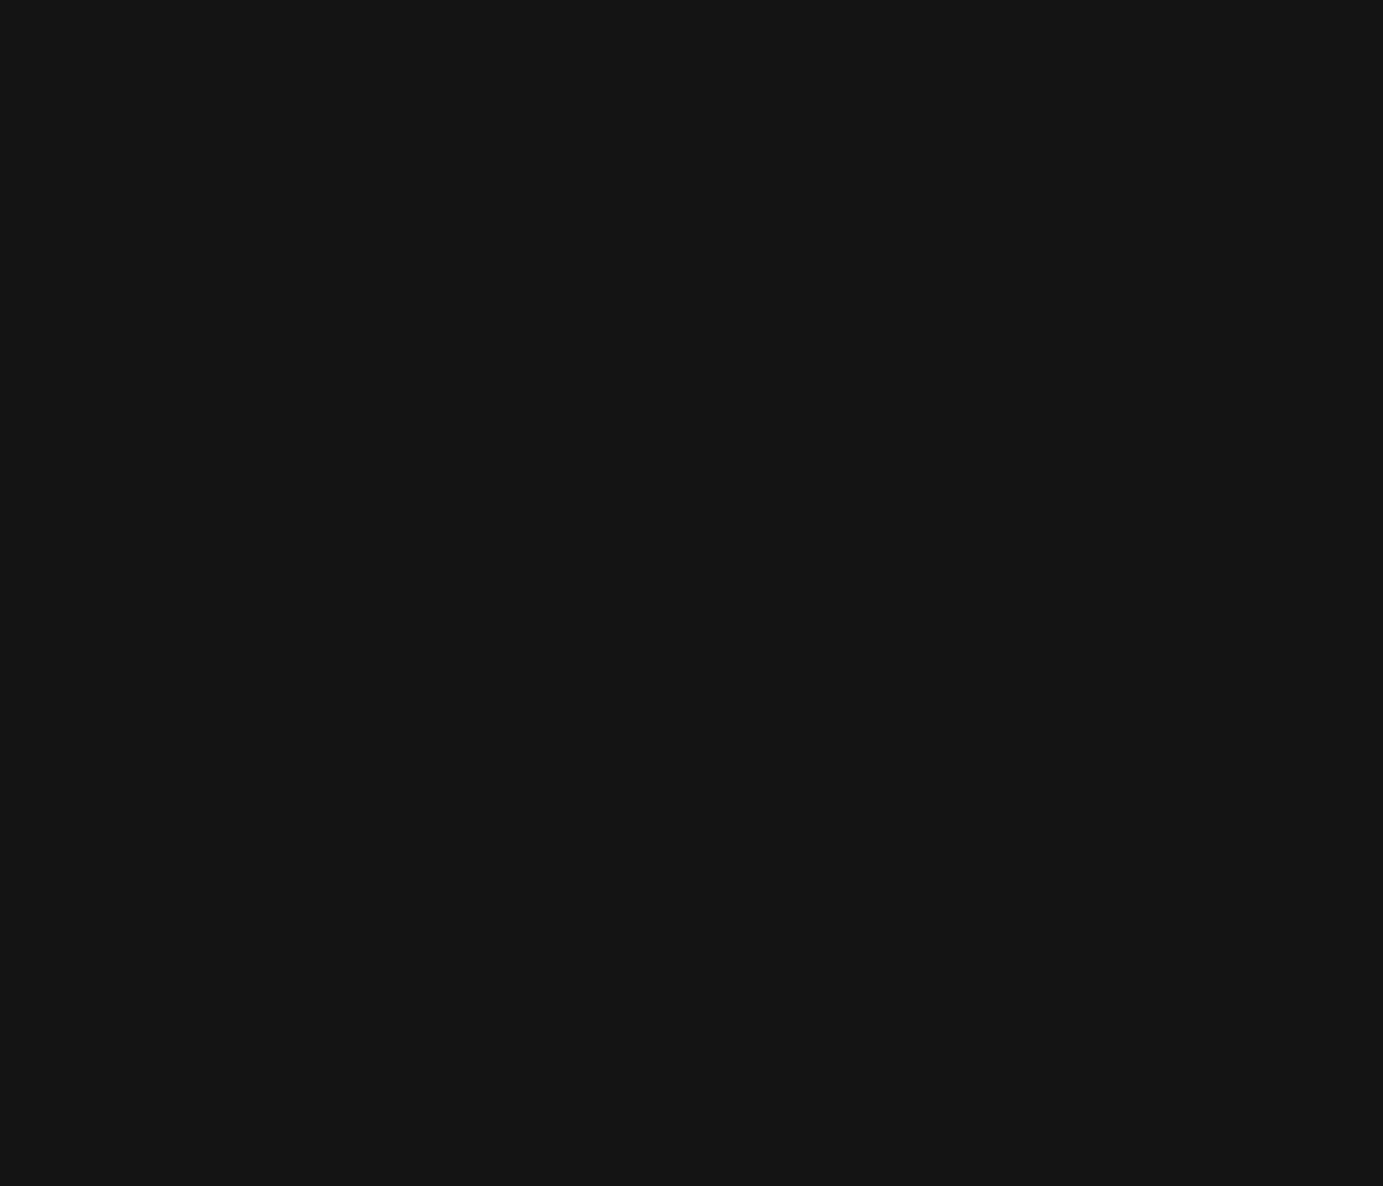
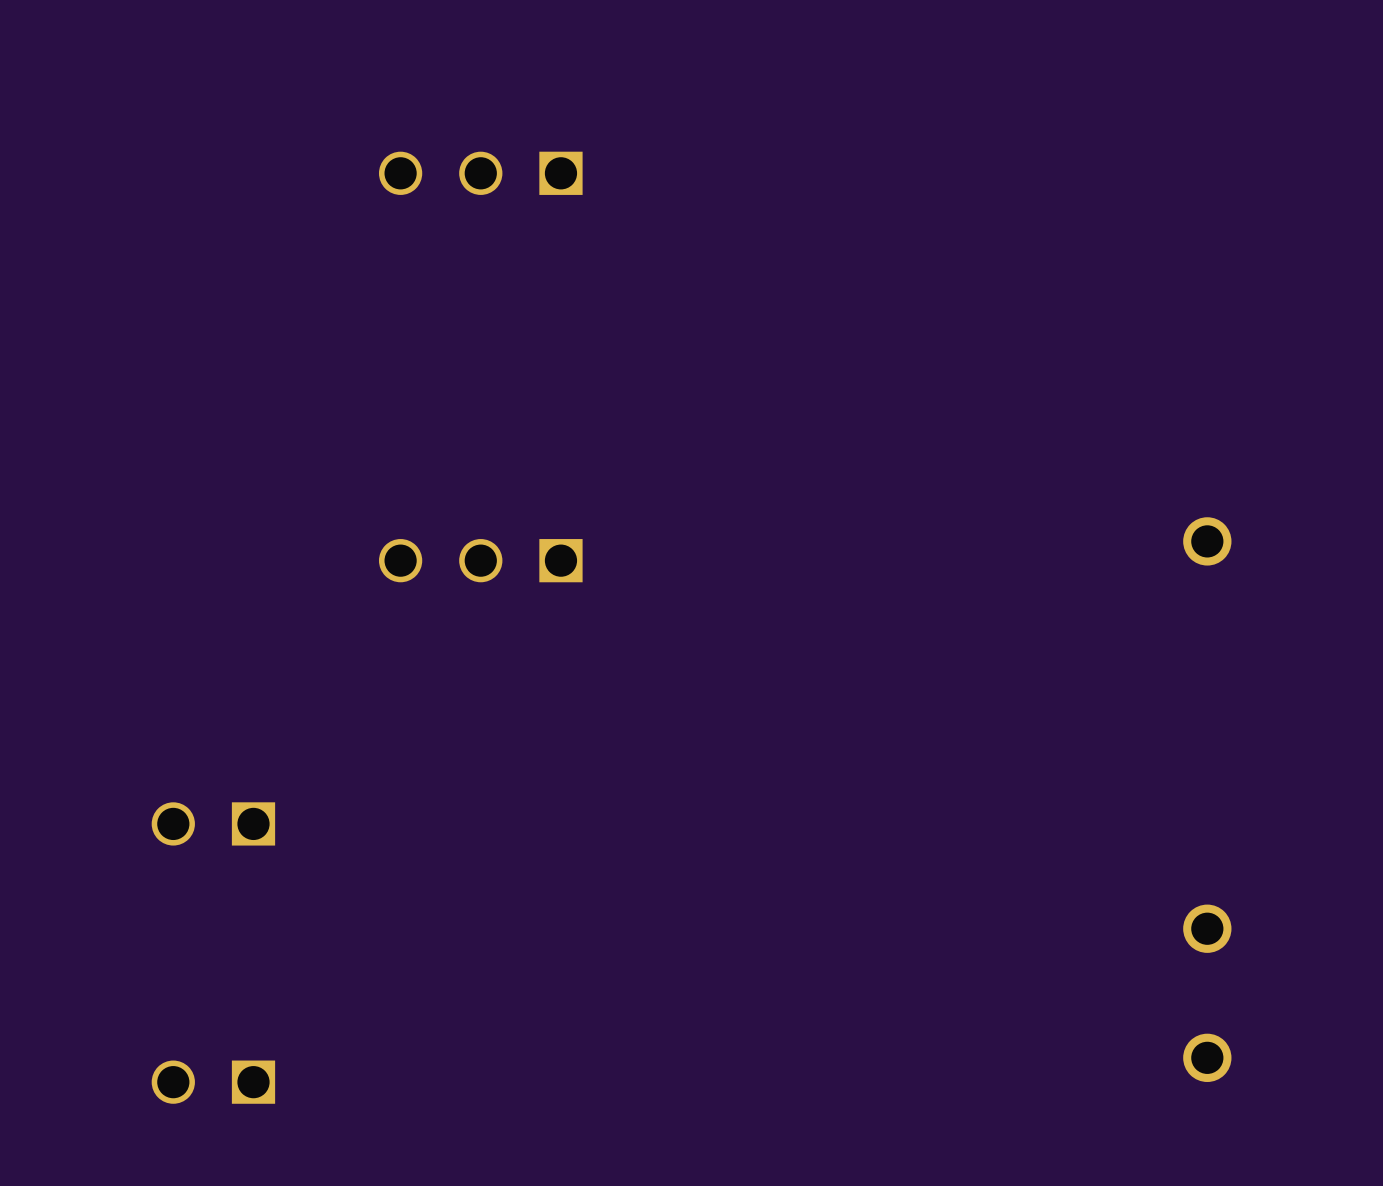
part: none -> (480, 173)
part: none -> (1207, 541)
part: none -> (480, 560)
part: none -> (213, 823)
part: none -> (1207, 928)
part: none -> (1207, 1057)
part: none -> (213, 1082)

